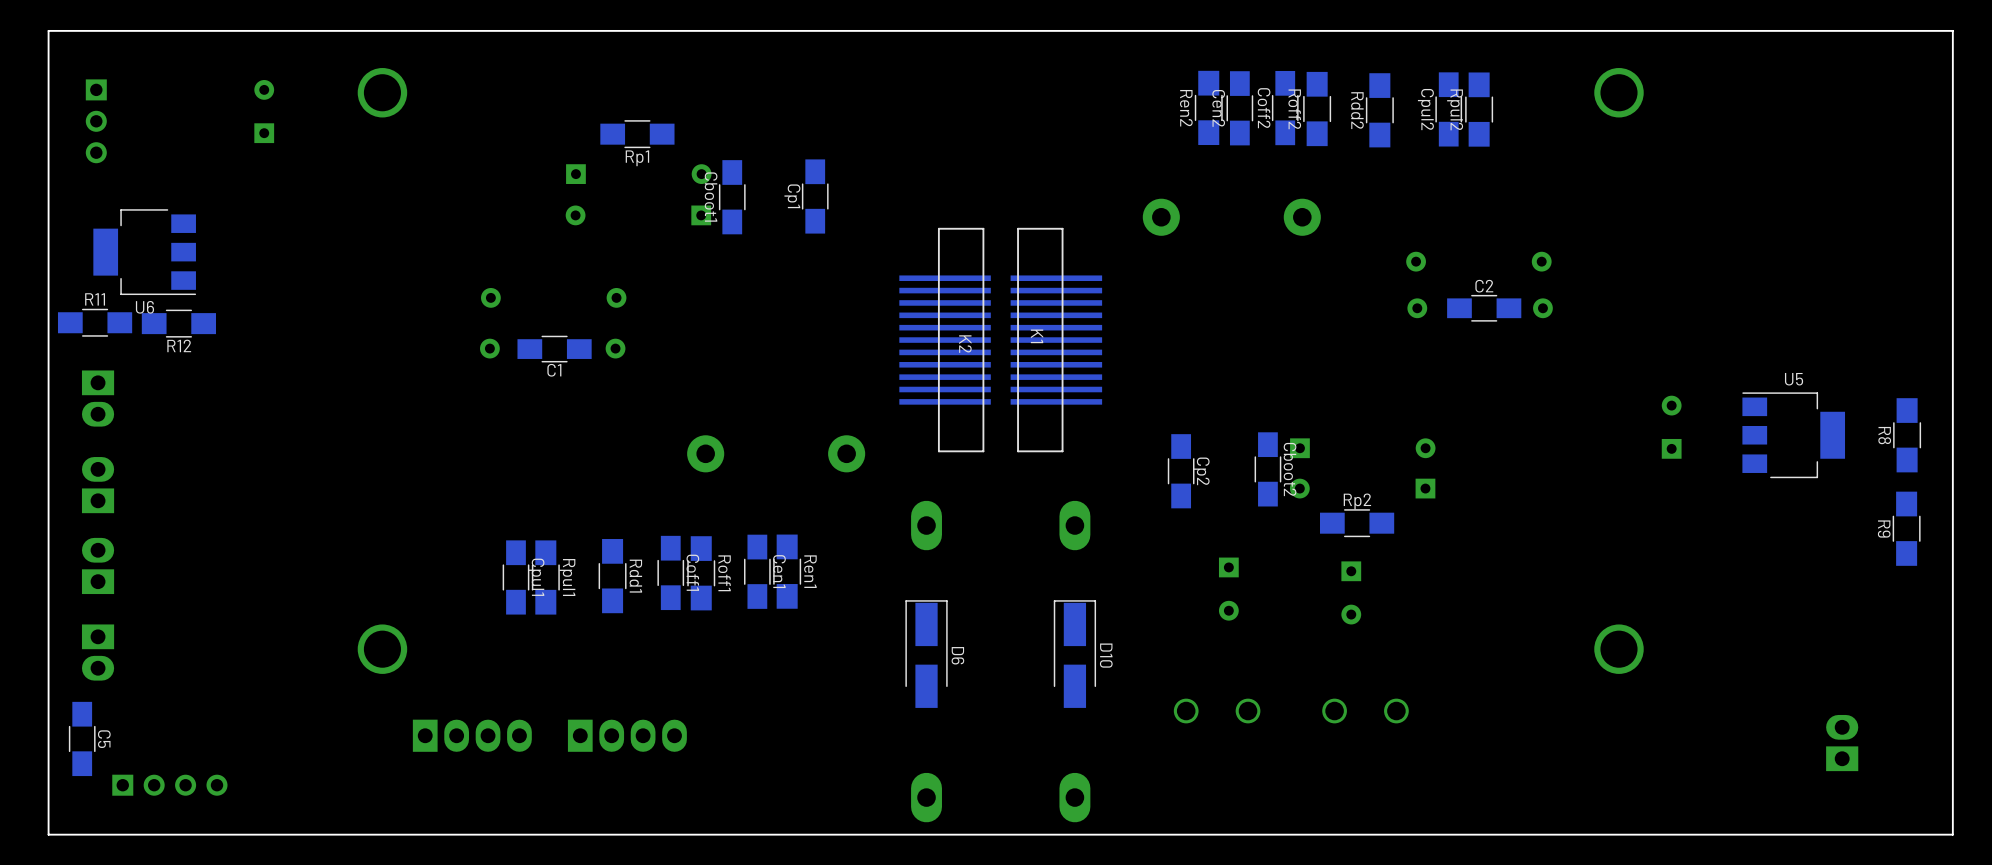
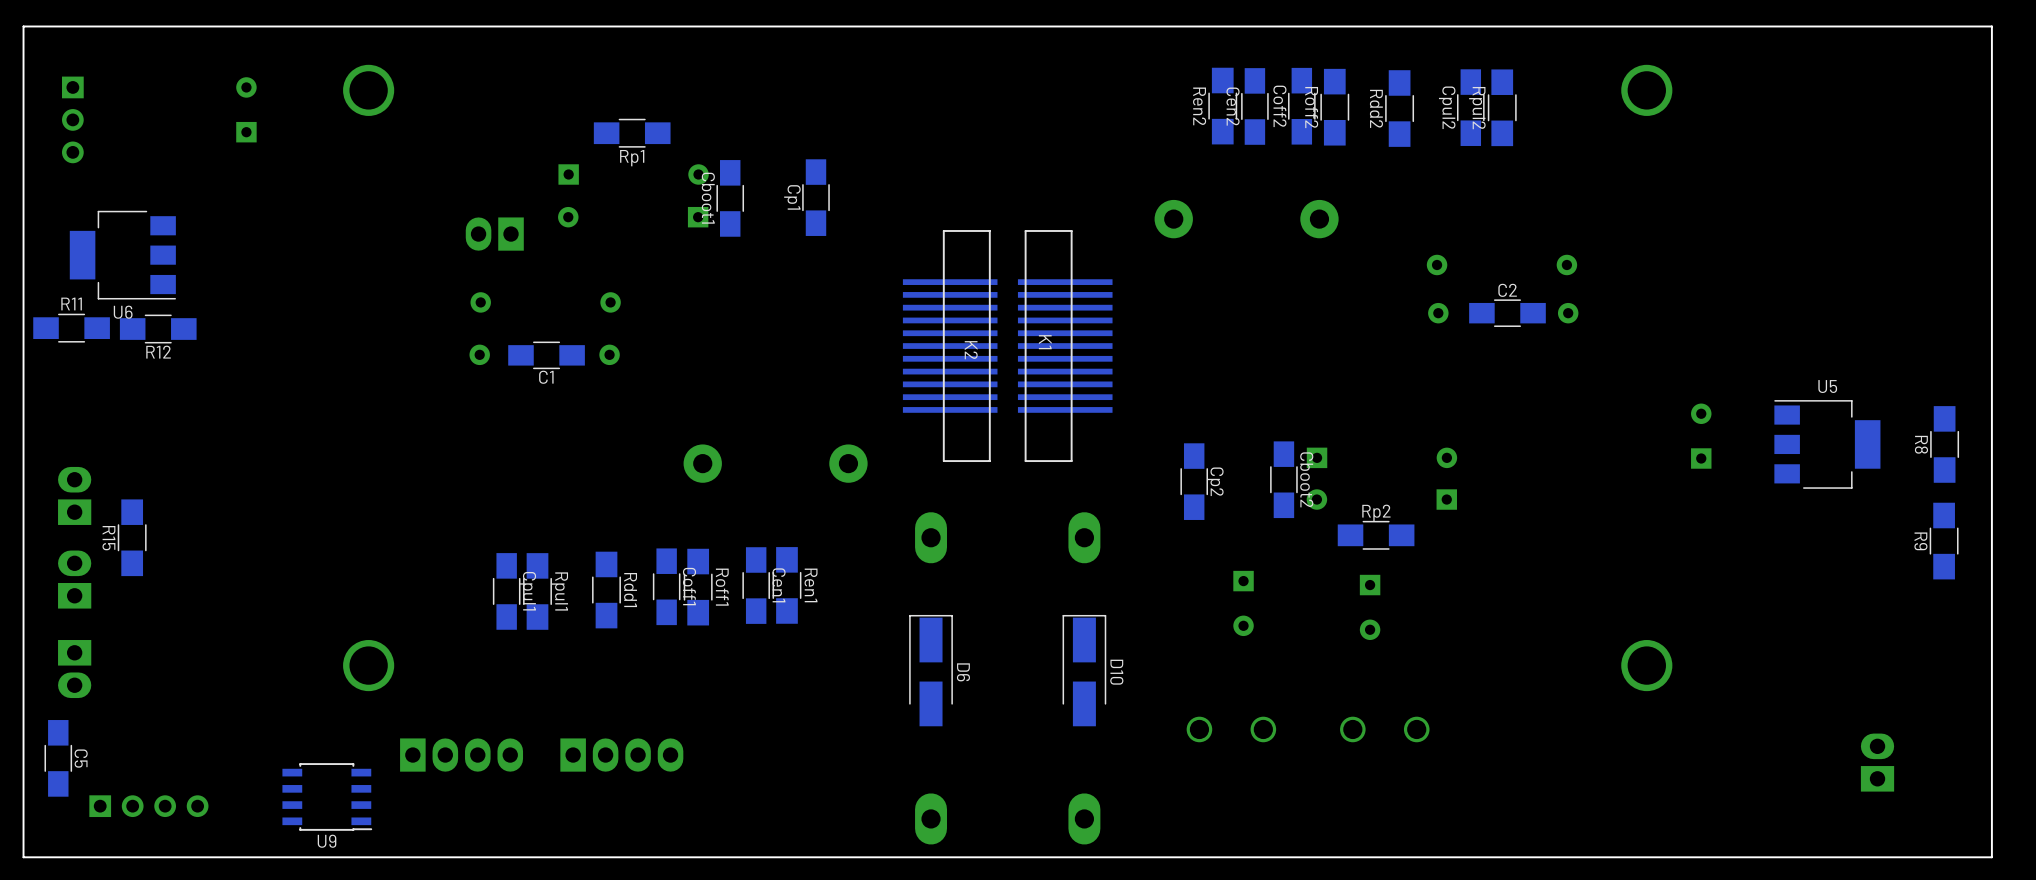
part: none -> (494, 234)
part: (98, 398) -> none
R15: none -> (132, 537)
U9: none -> (327, 796)

